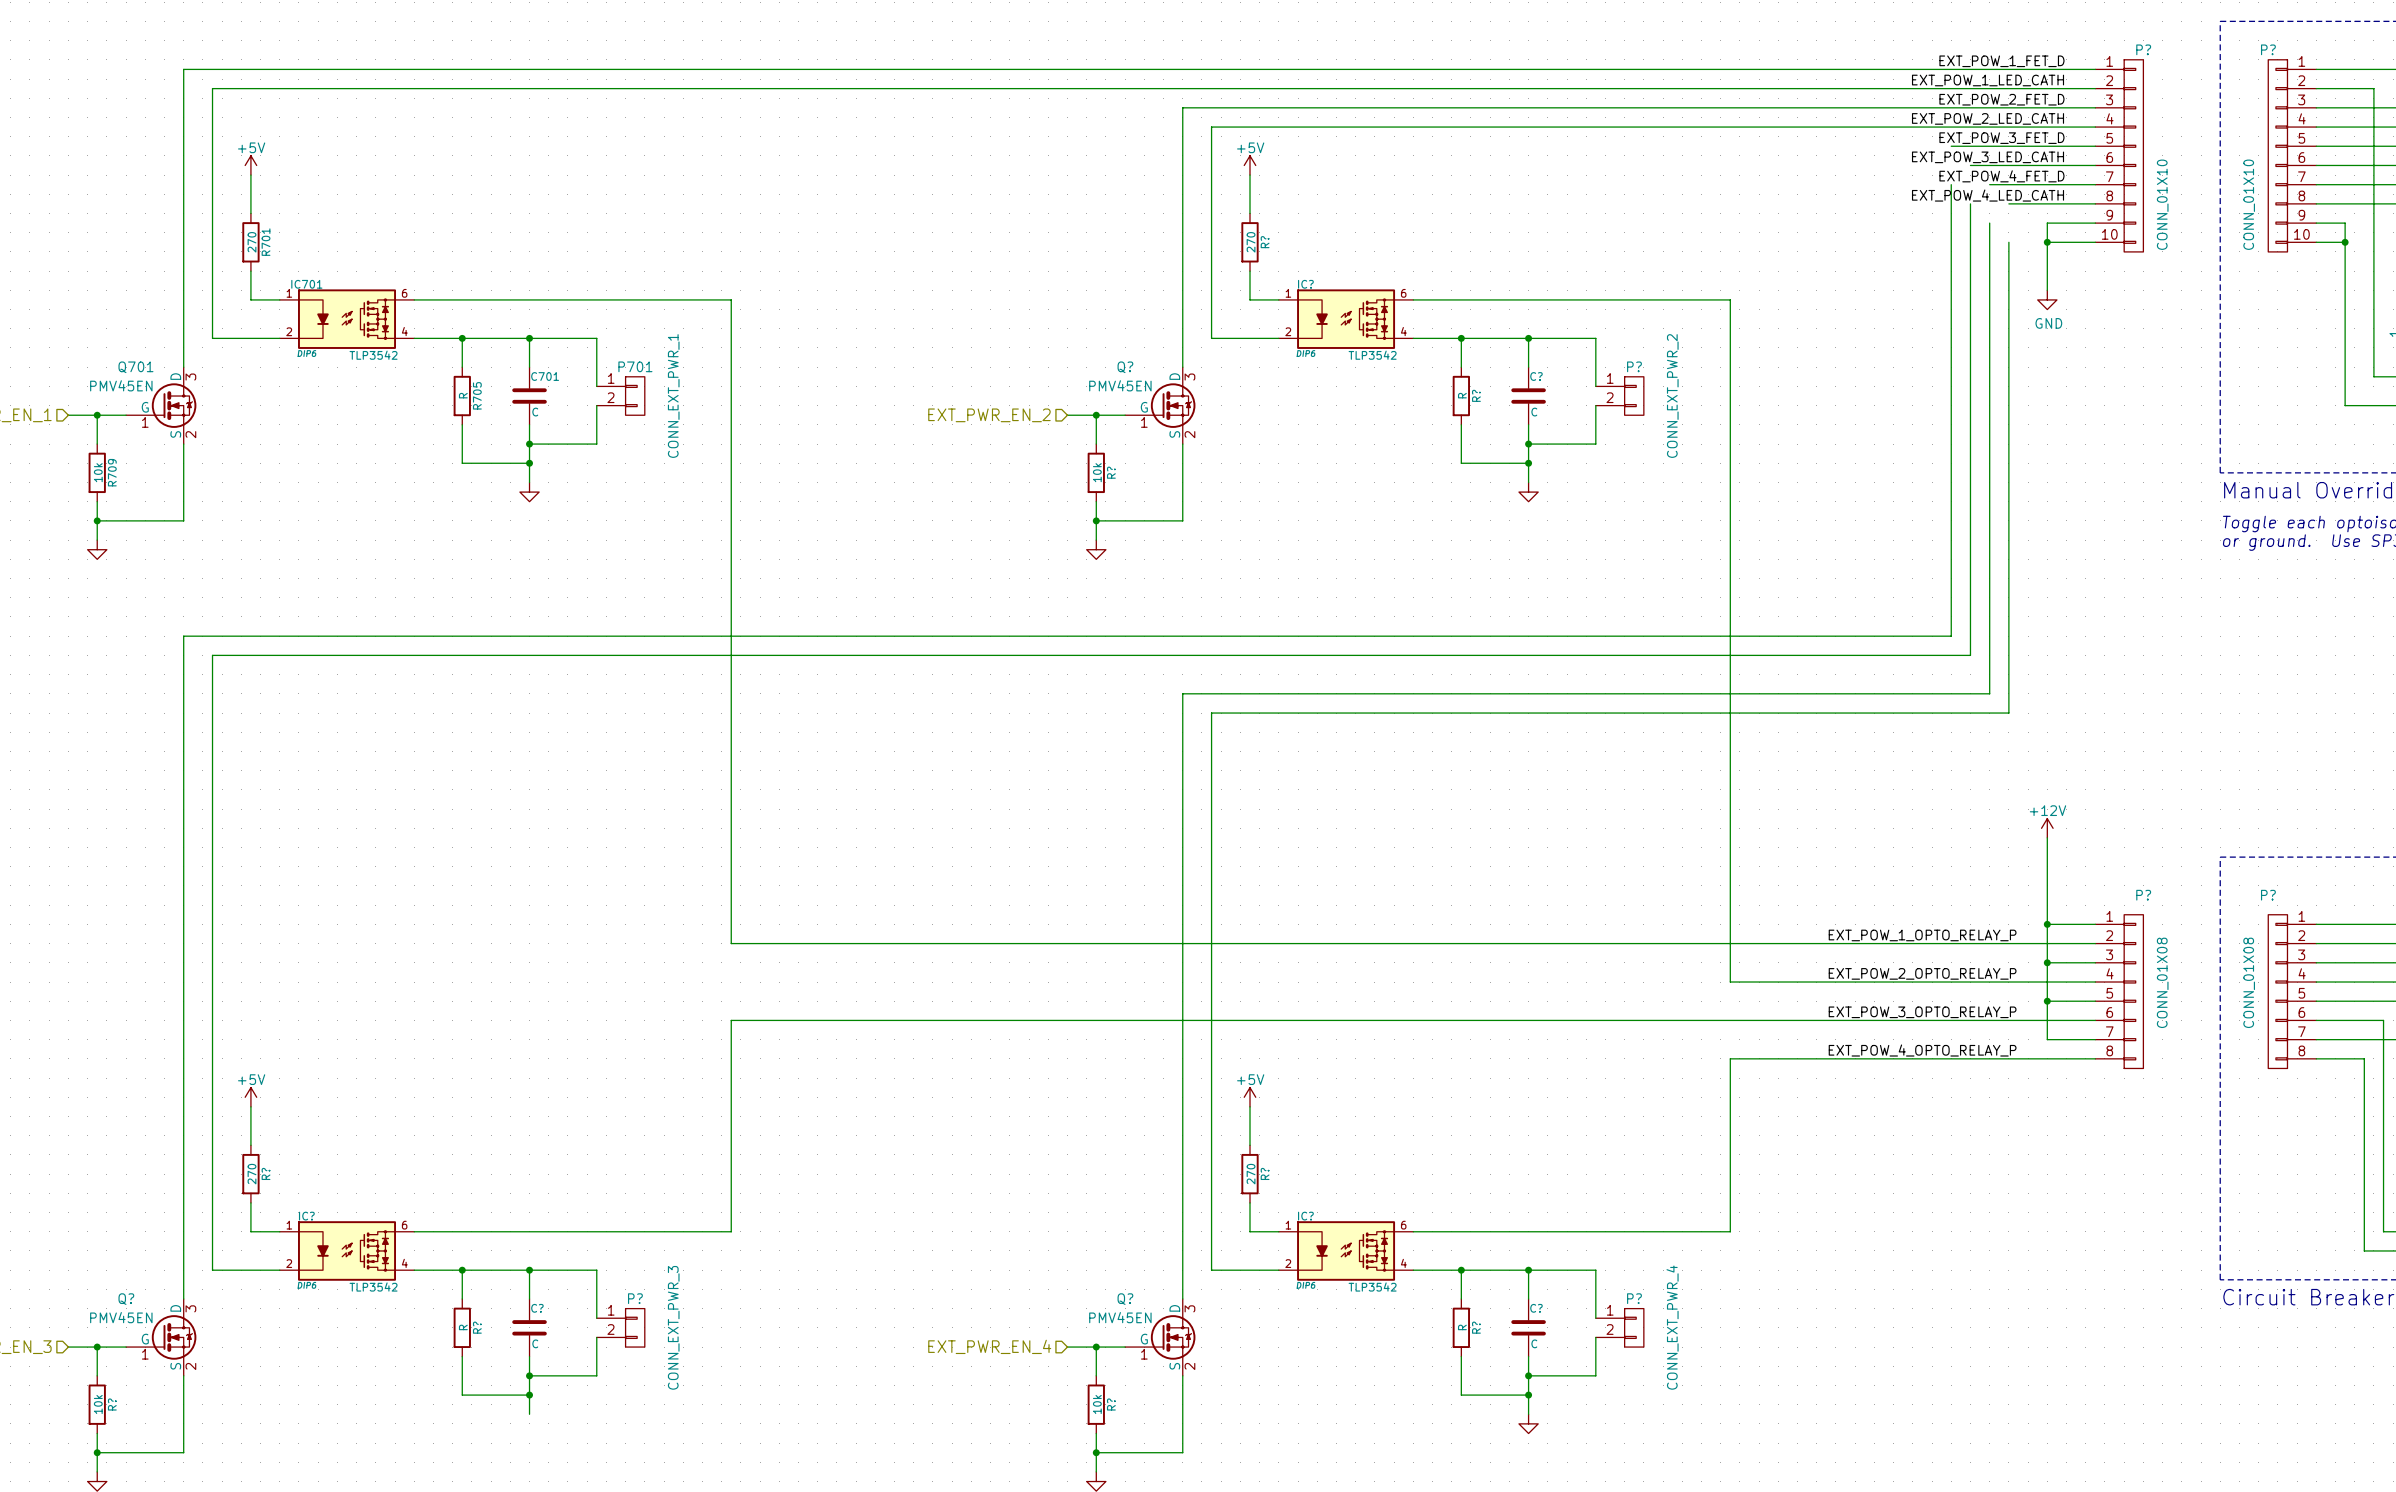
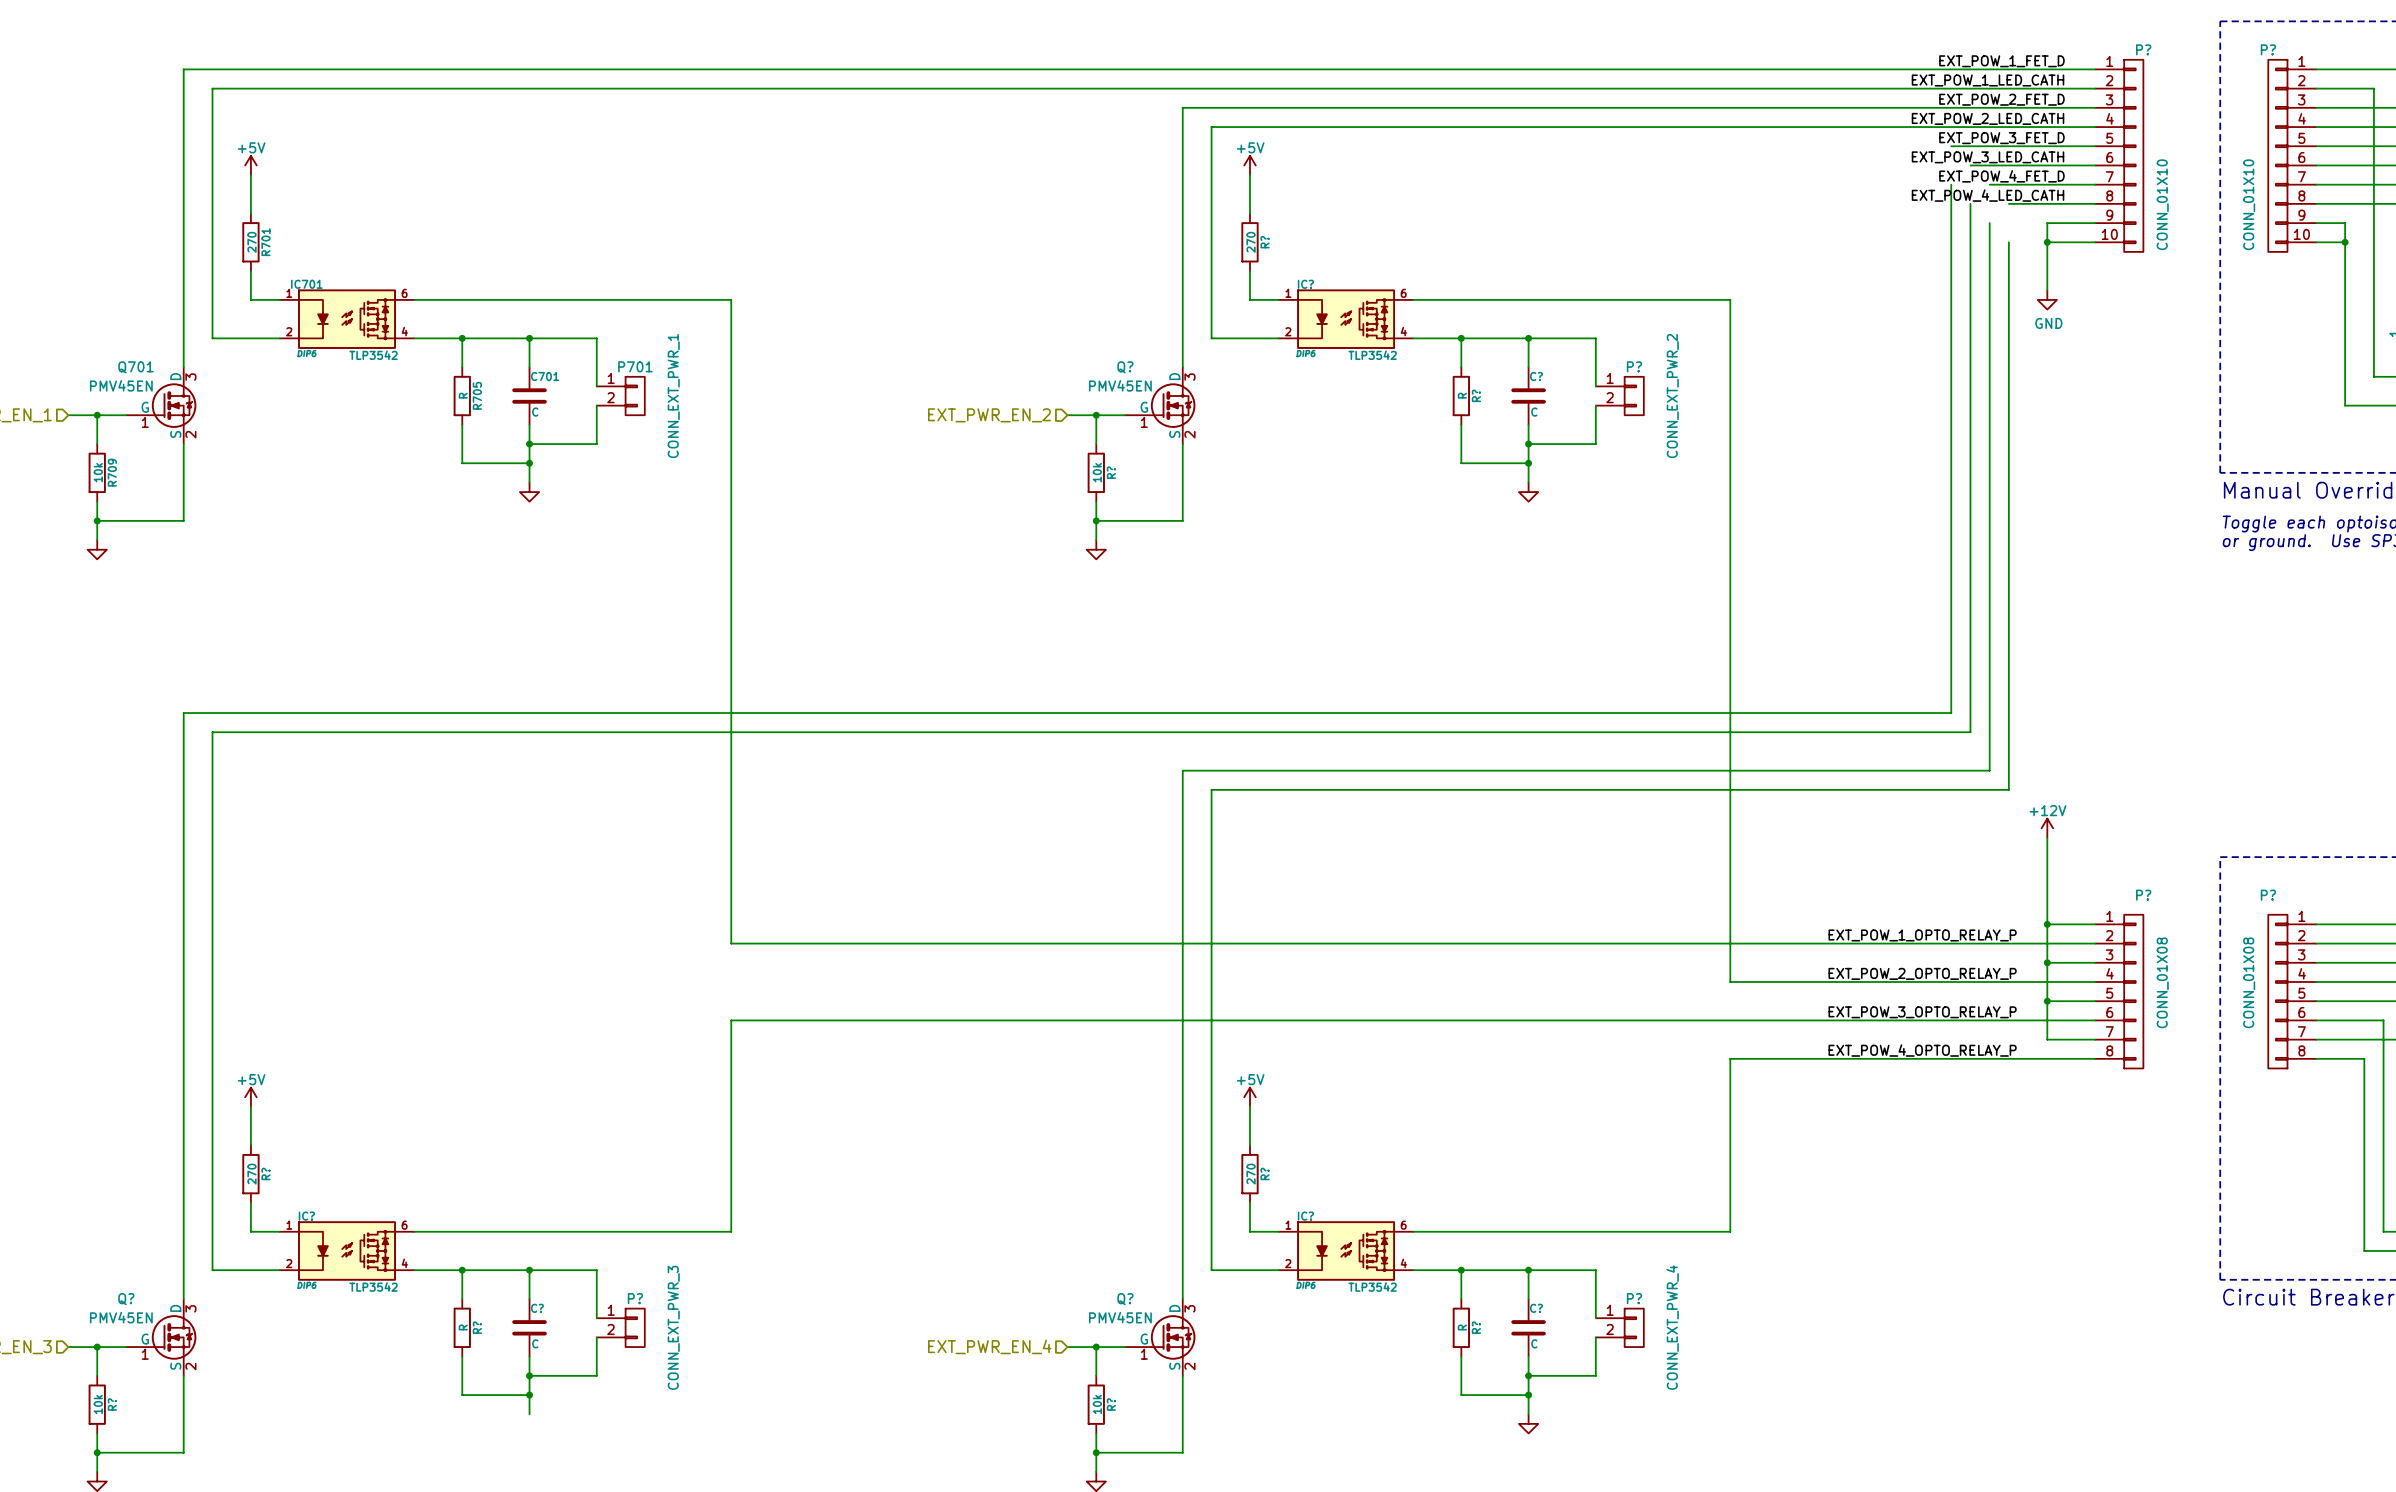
wire: (1951, 636) (183, 636) (183, 713) -> (1211, 713) (183, 713)
wire: (1970, 655) (212, 655) (212, 732) -> (1970, 655) (1970, 732) (212, 732)
wire: (1989, 693) (1182, 693) (1182, 770) -> (1989, 693) (1989, 770) (1182, 770)
wire: (1211, 713) (1211, 789) -> (2008, 713) (2008, 789) (1211, 789)
wire: (1951, 713) (2008, 713) -> (1951, 713) (1951, 636)

